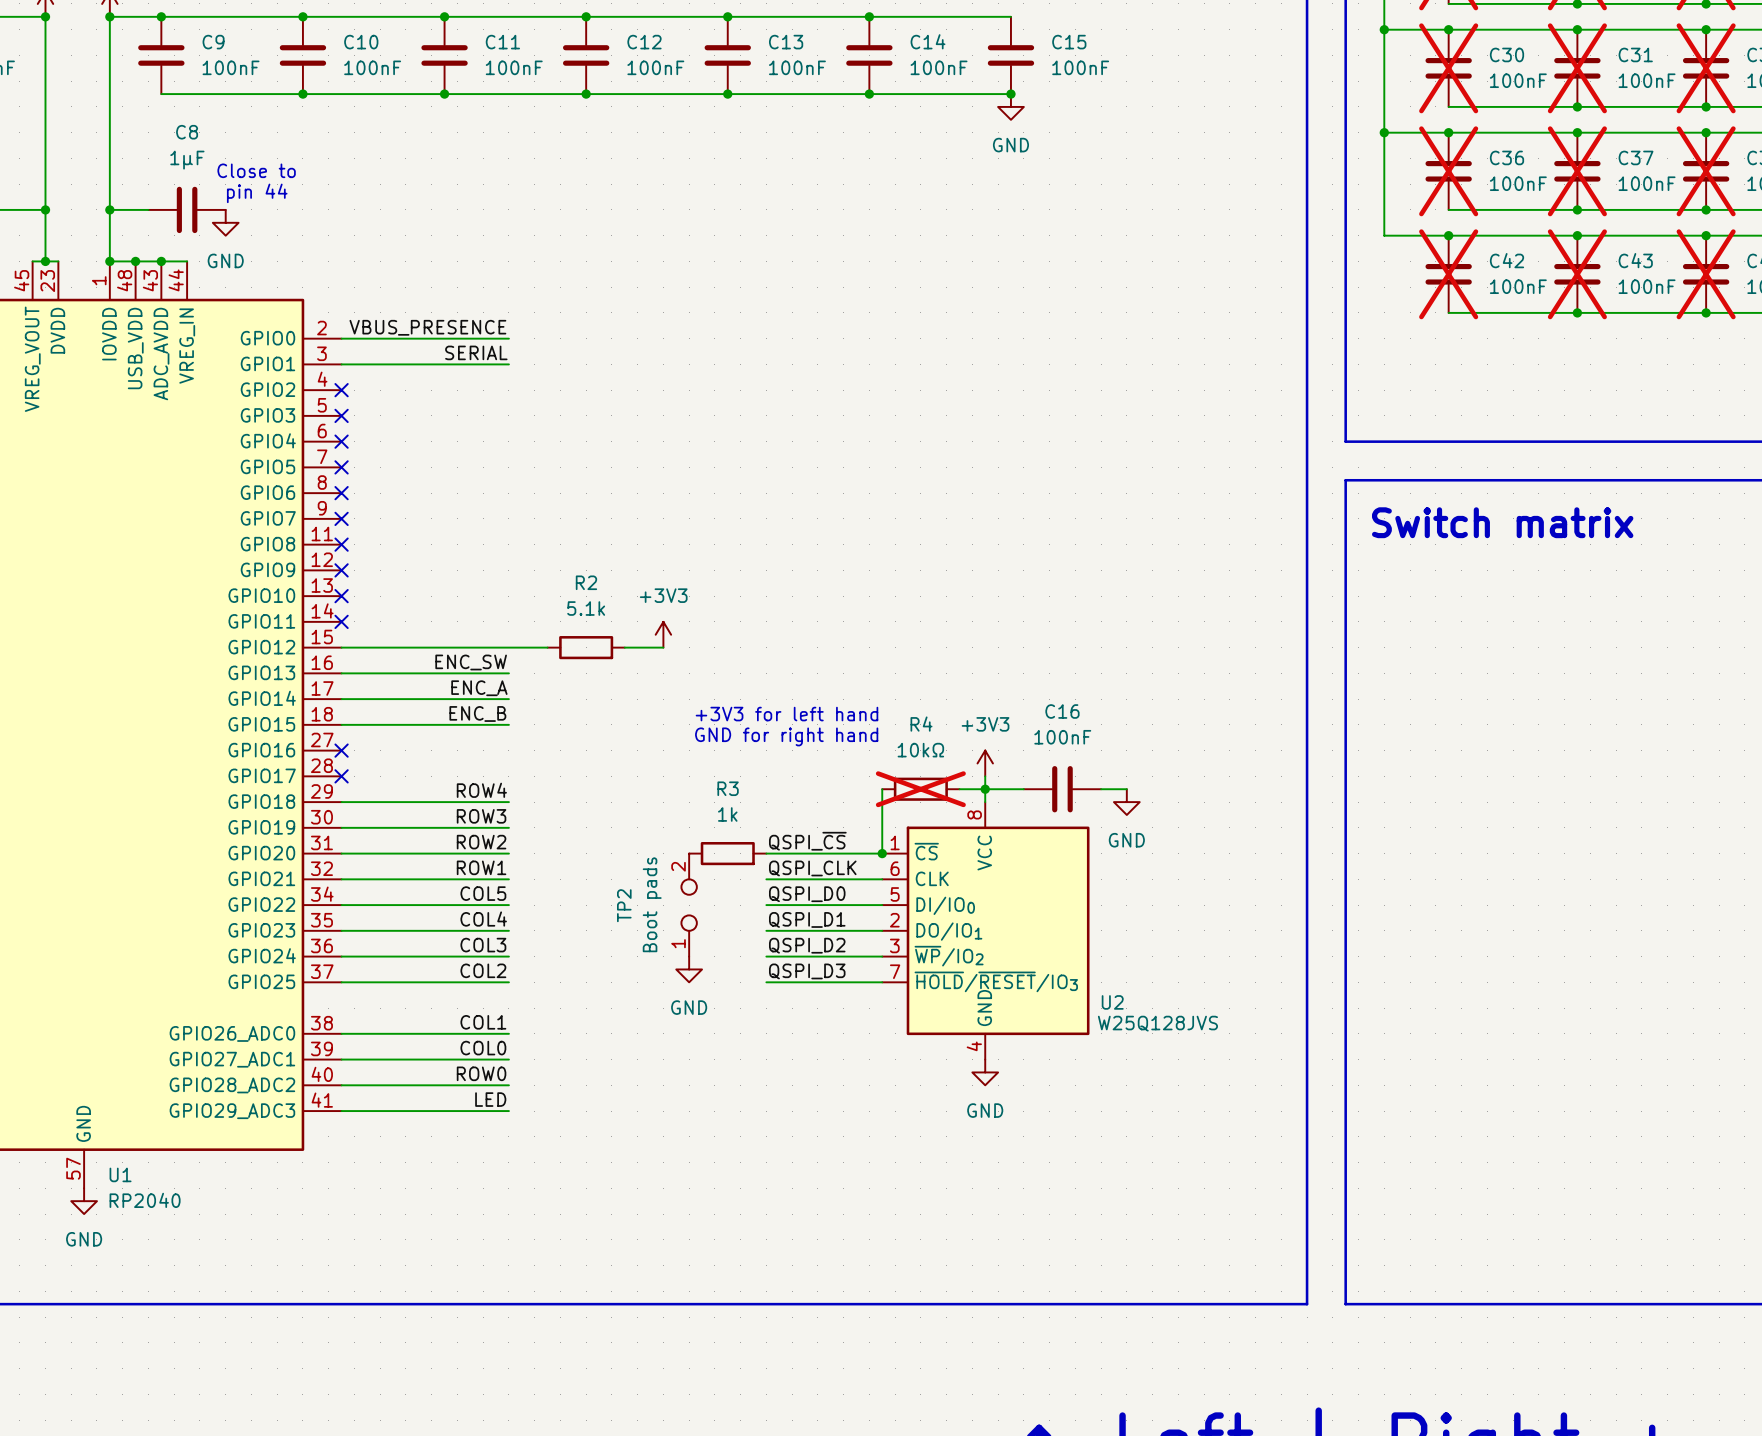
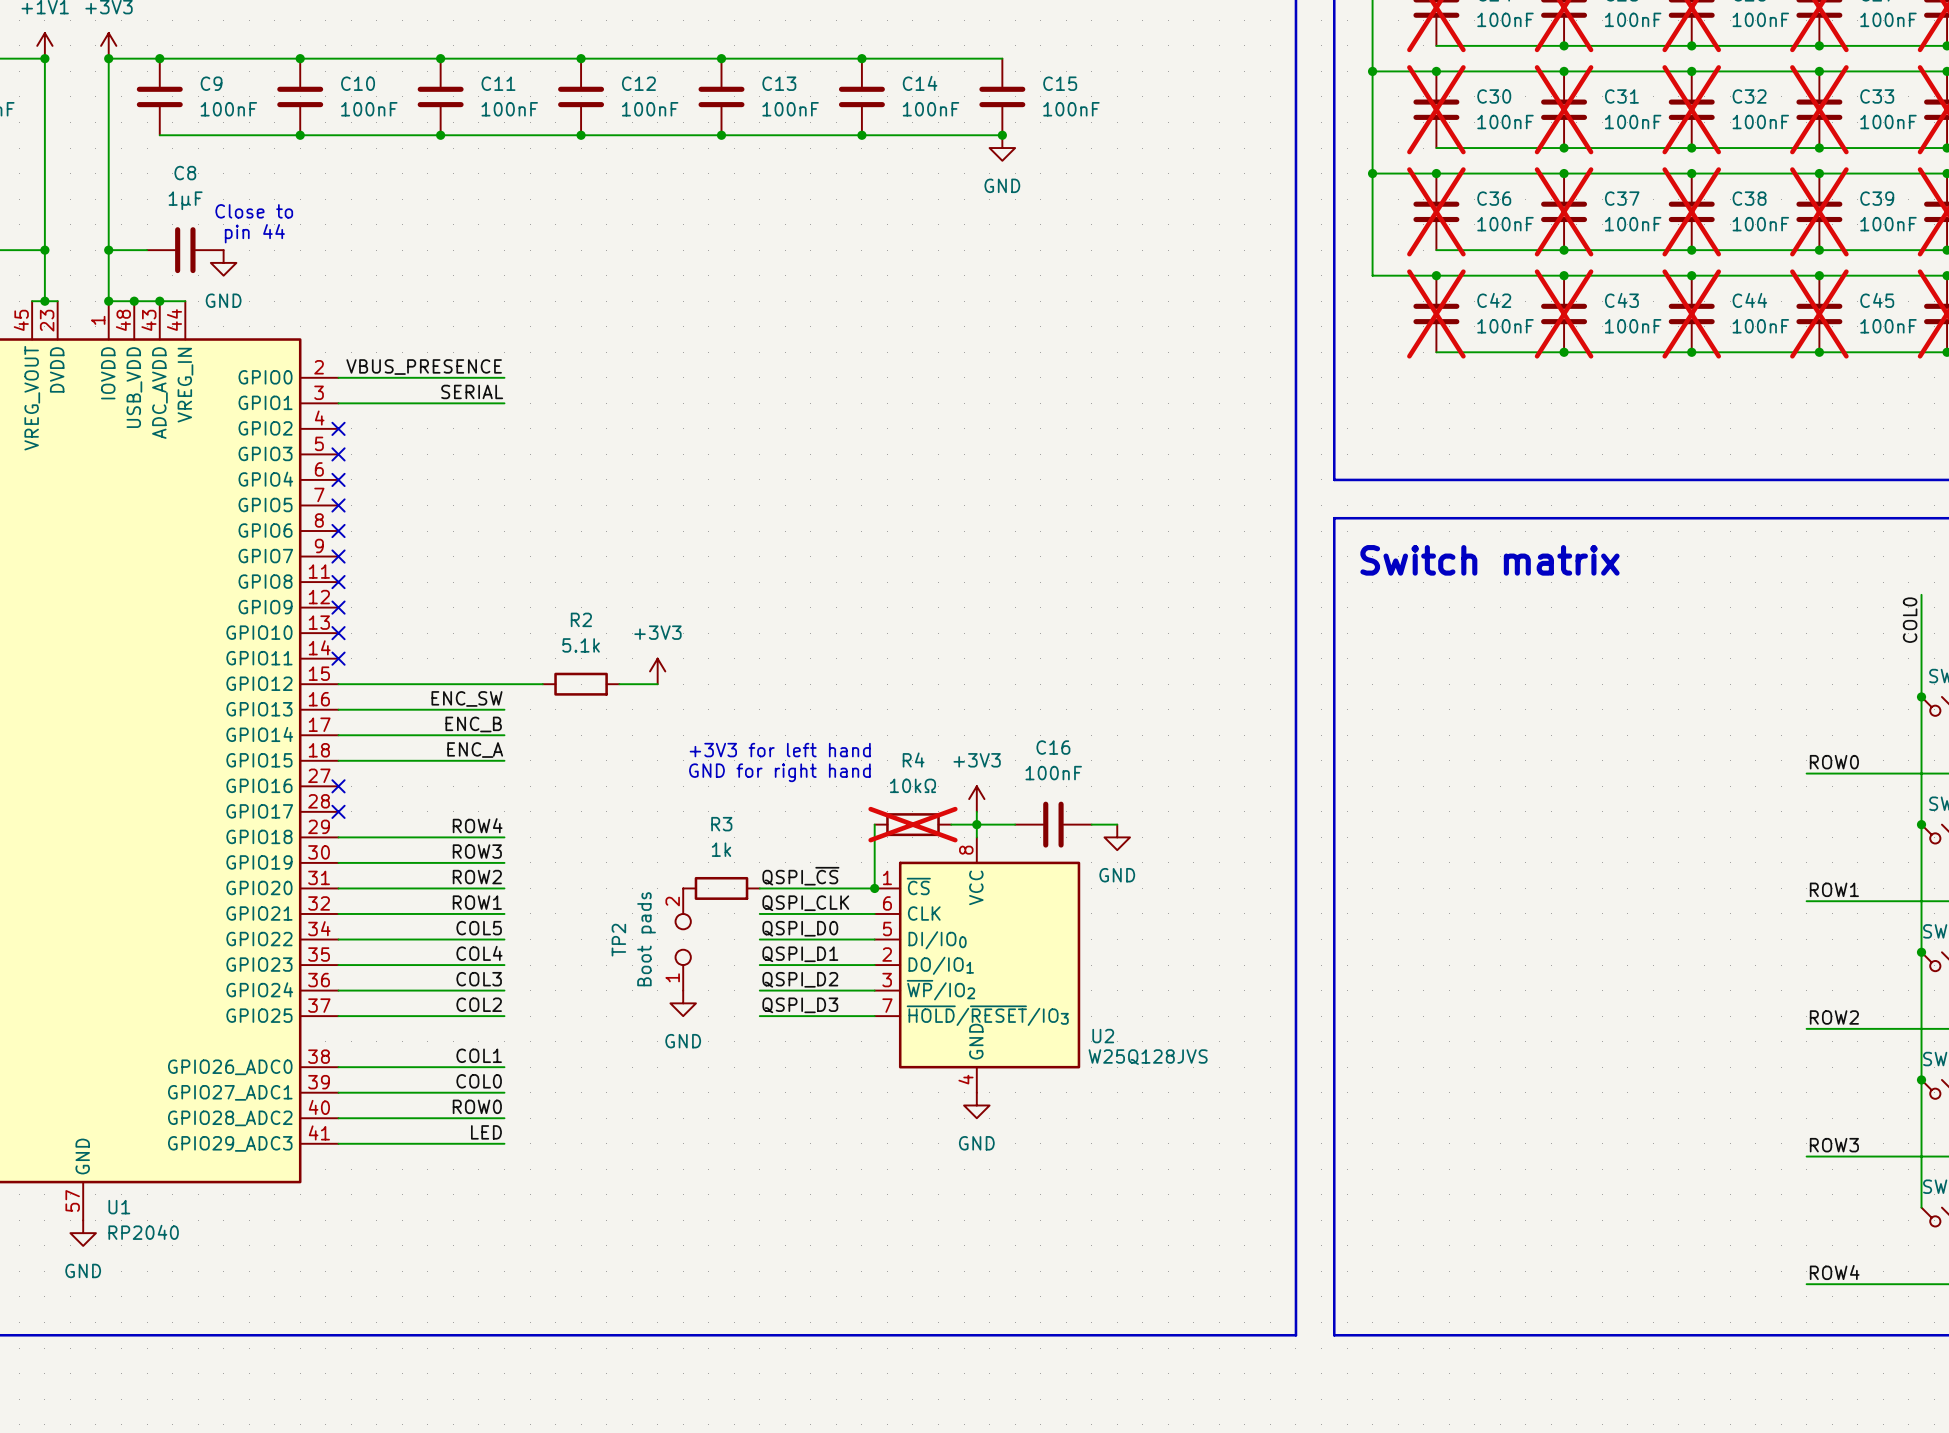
label: ENC_A (479, 688) -> ENC_B (473, 724)
label: ENC_B (477, 713) -> ENC_A (475, 750)

